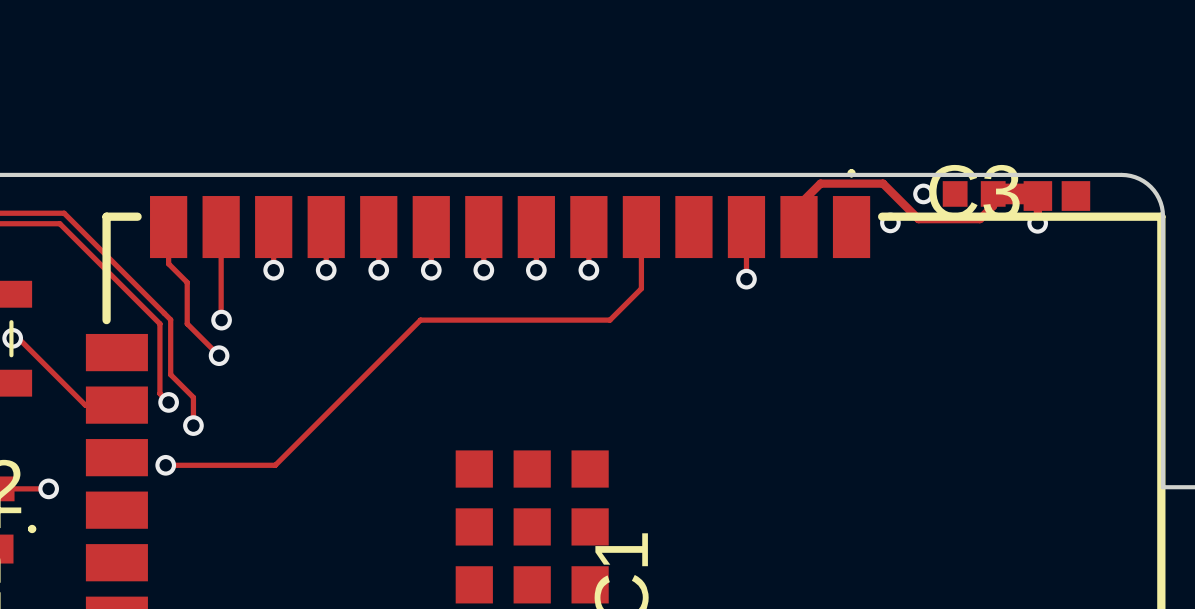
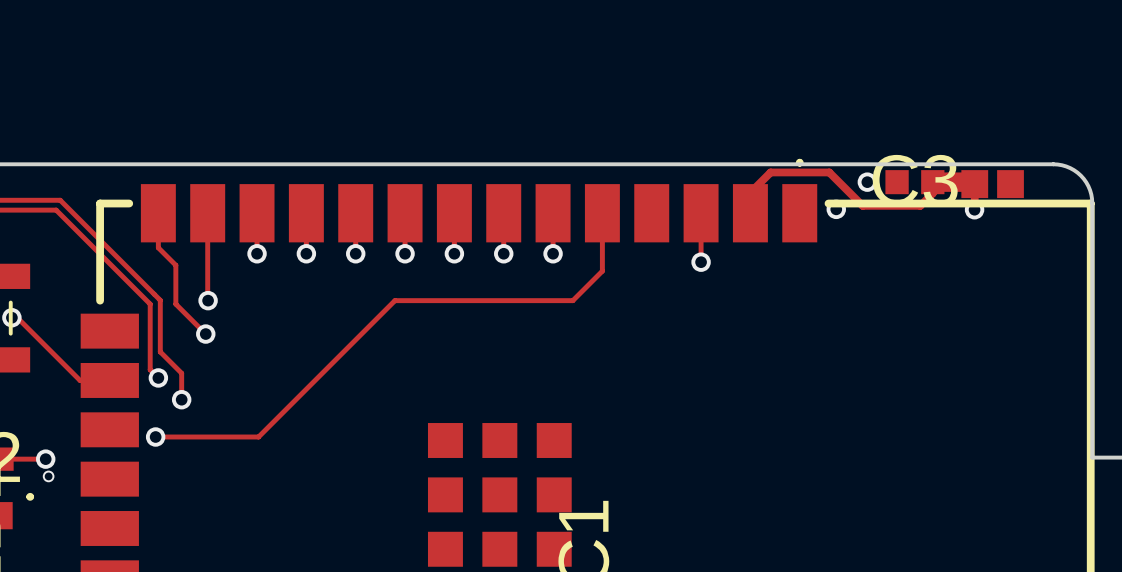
via: none -> (48, 476)

